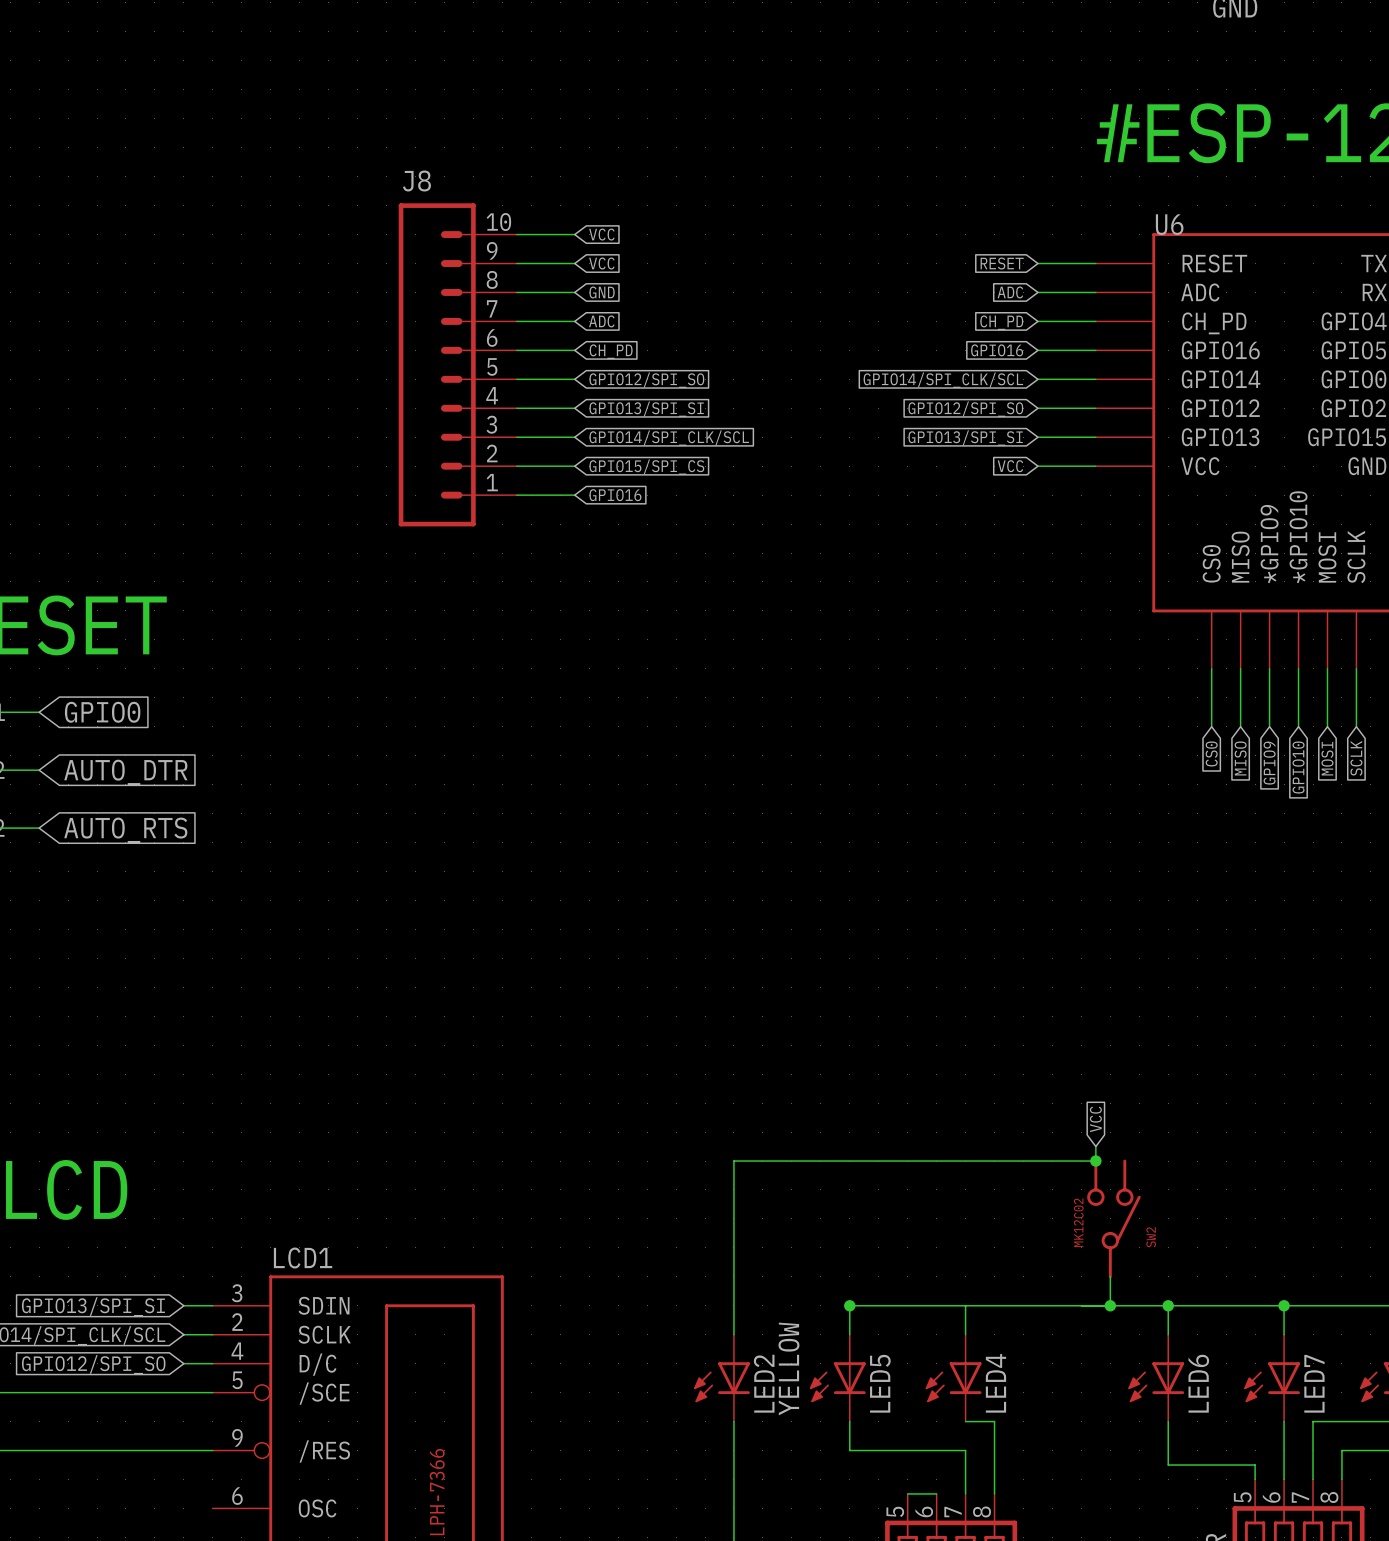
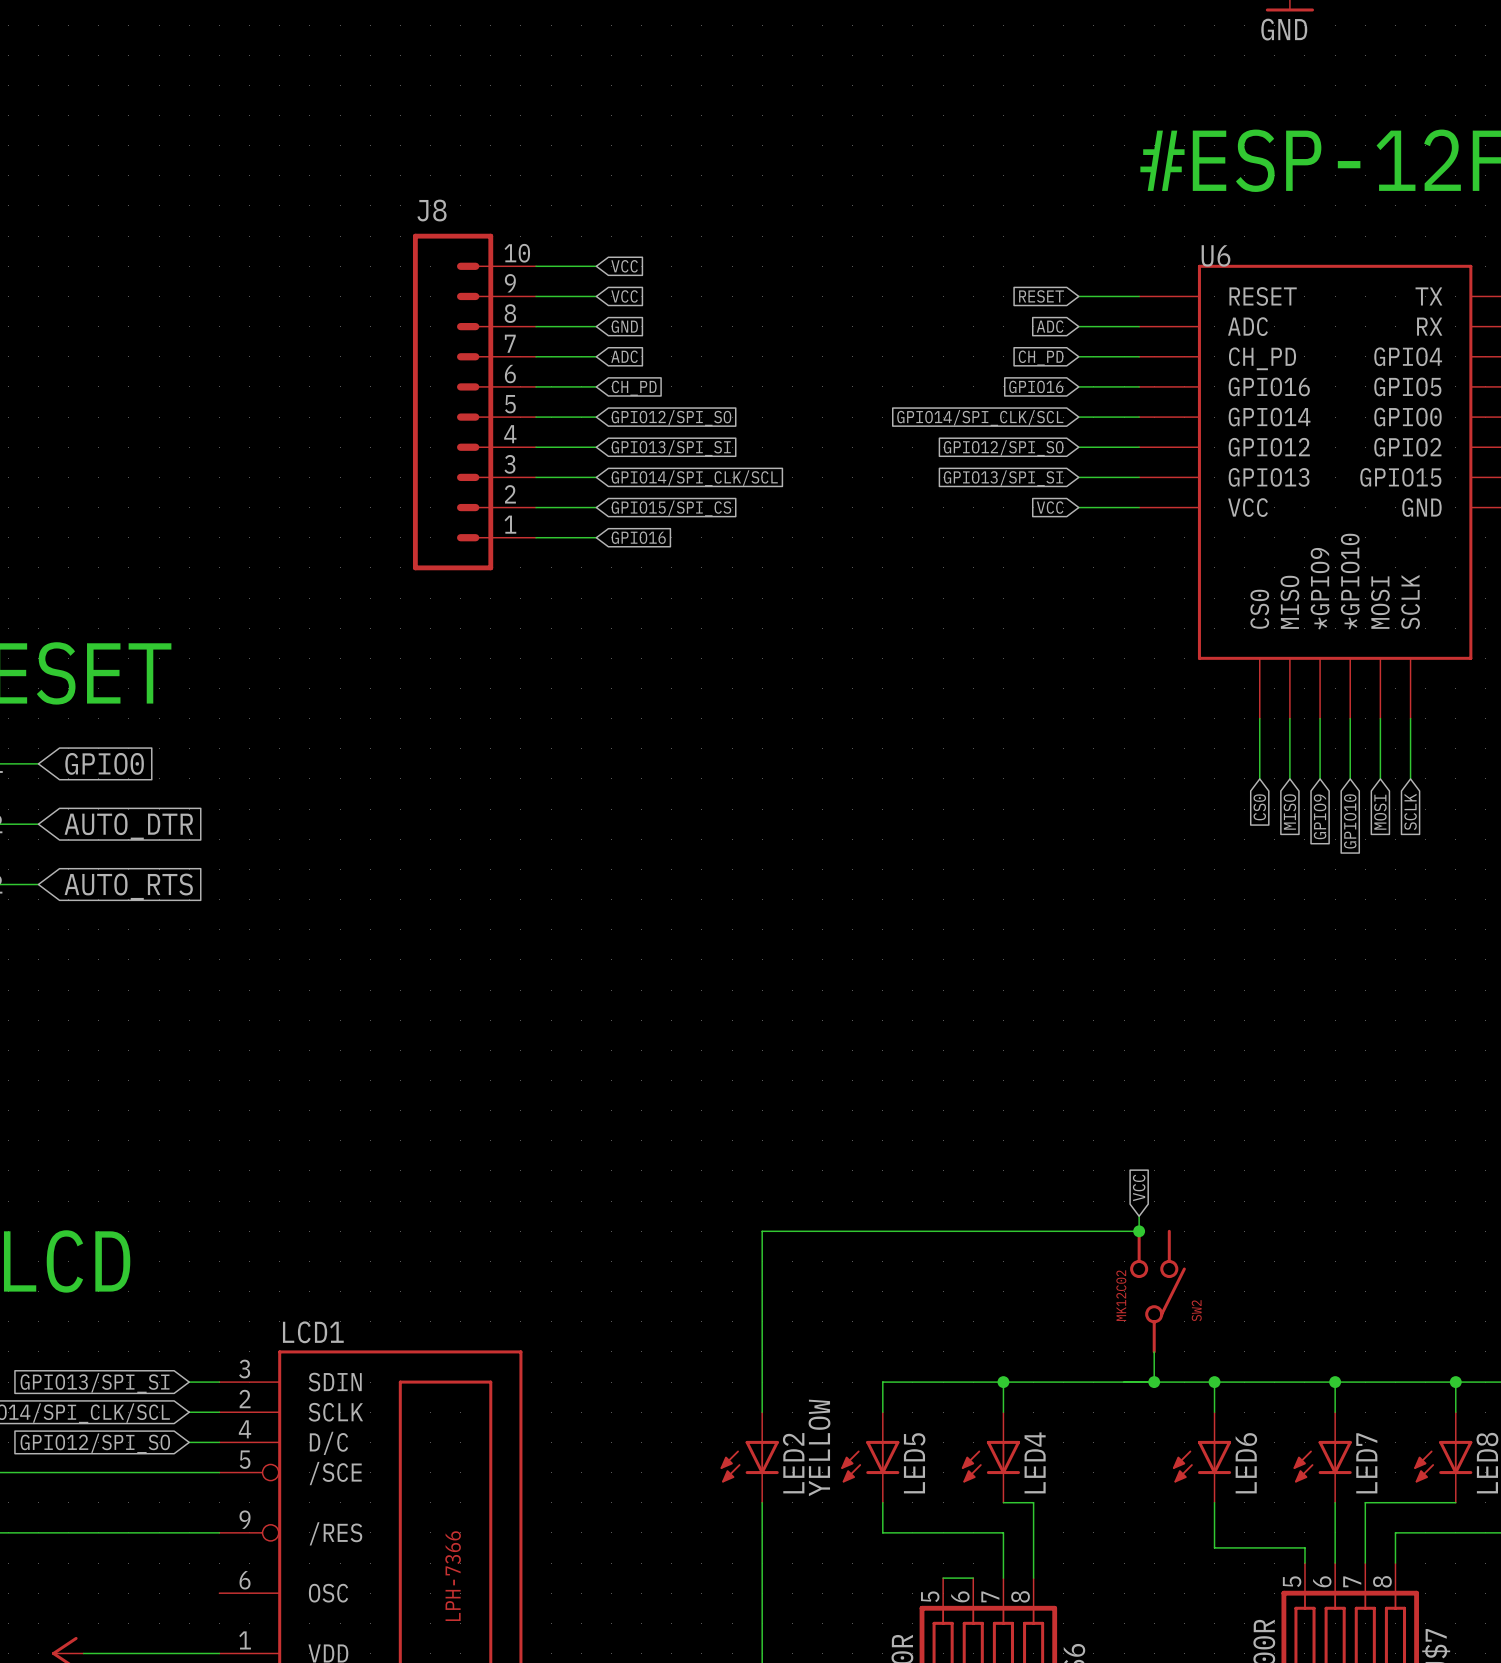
junction: (849, 1305) -> none
junction: none -> (1003, 1382)

